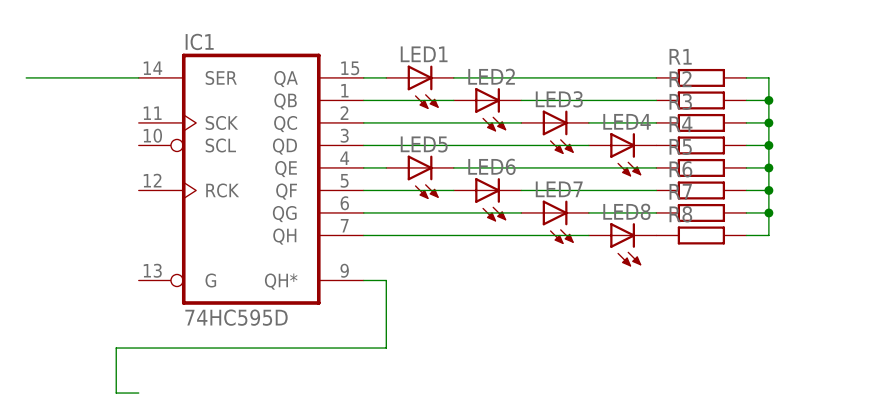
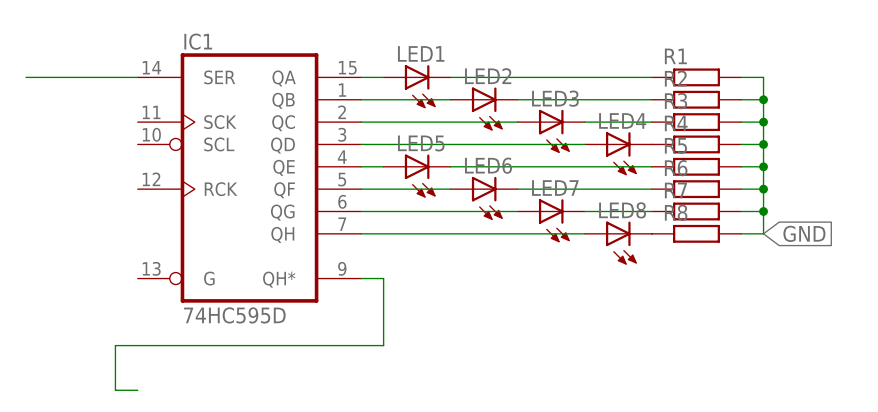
global label: none -> GND (804, 233)

